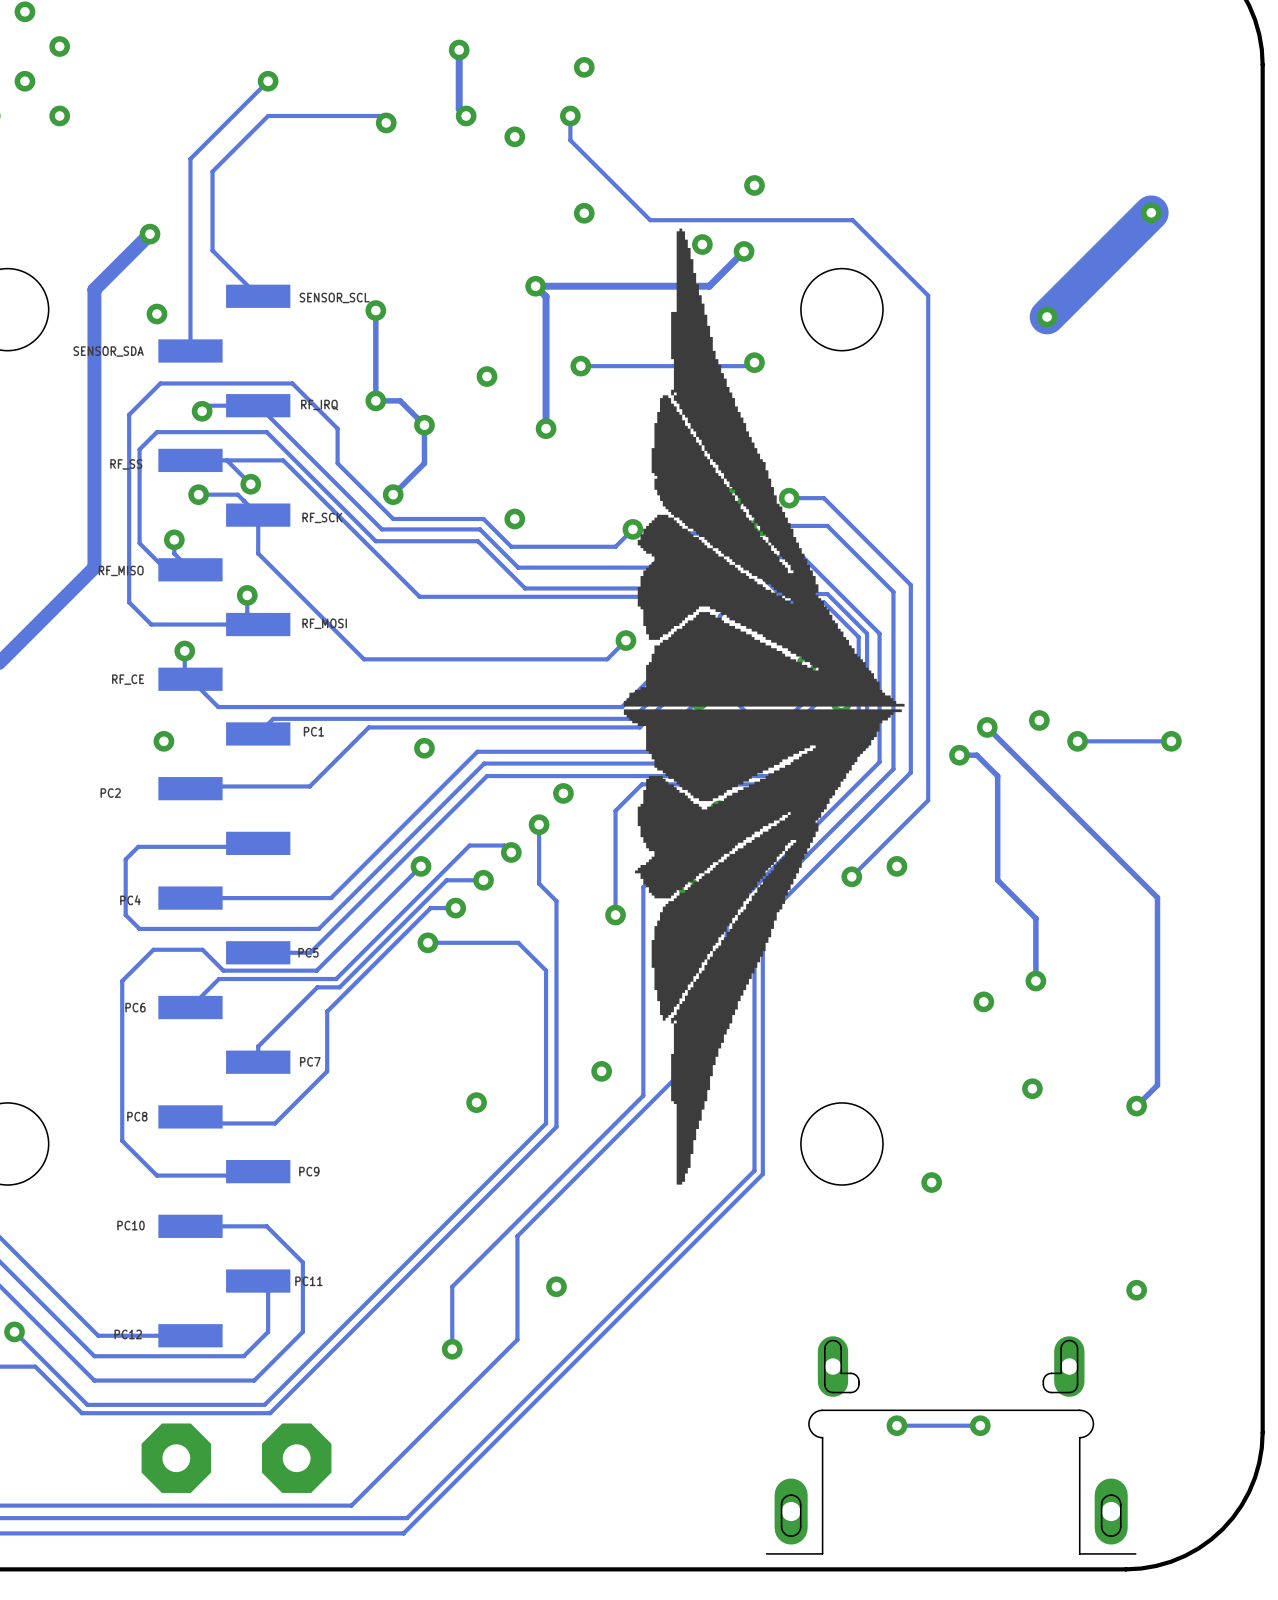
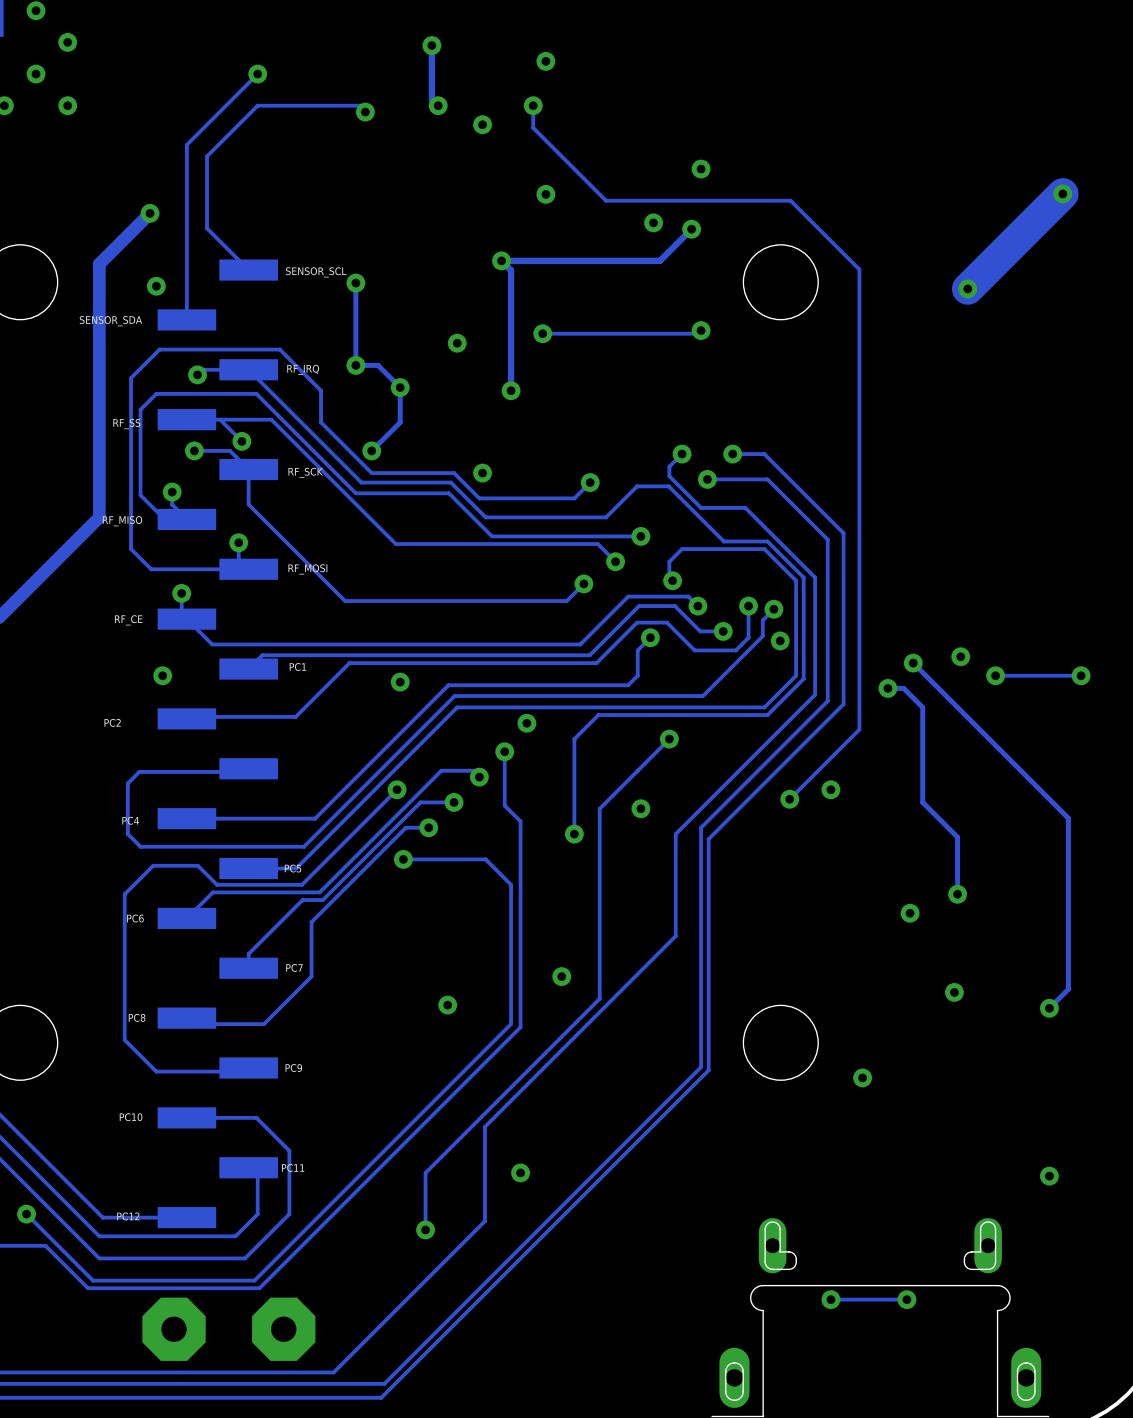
drawing: [623, 228, 905, 1185] -> none

